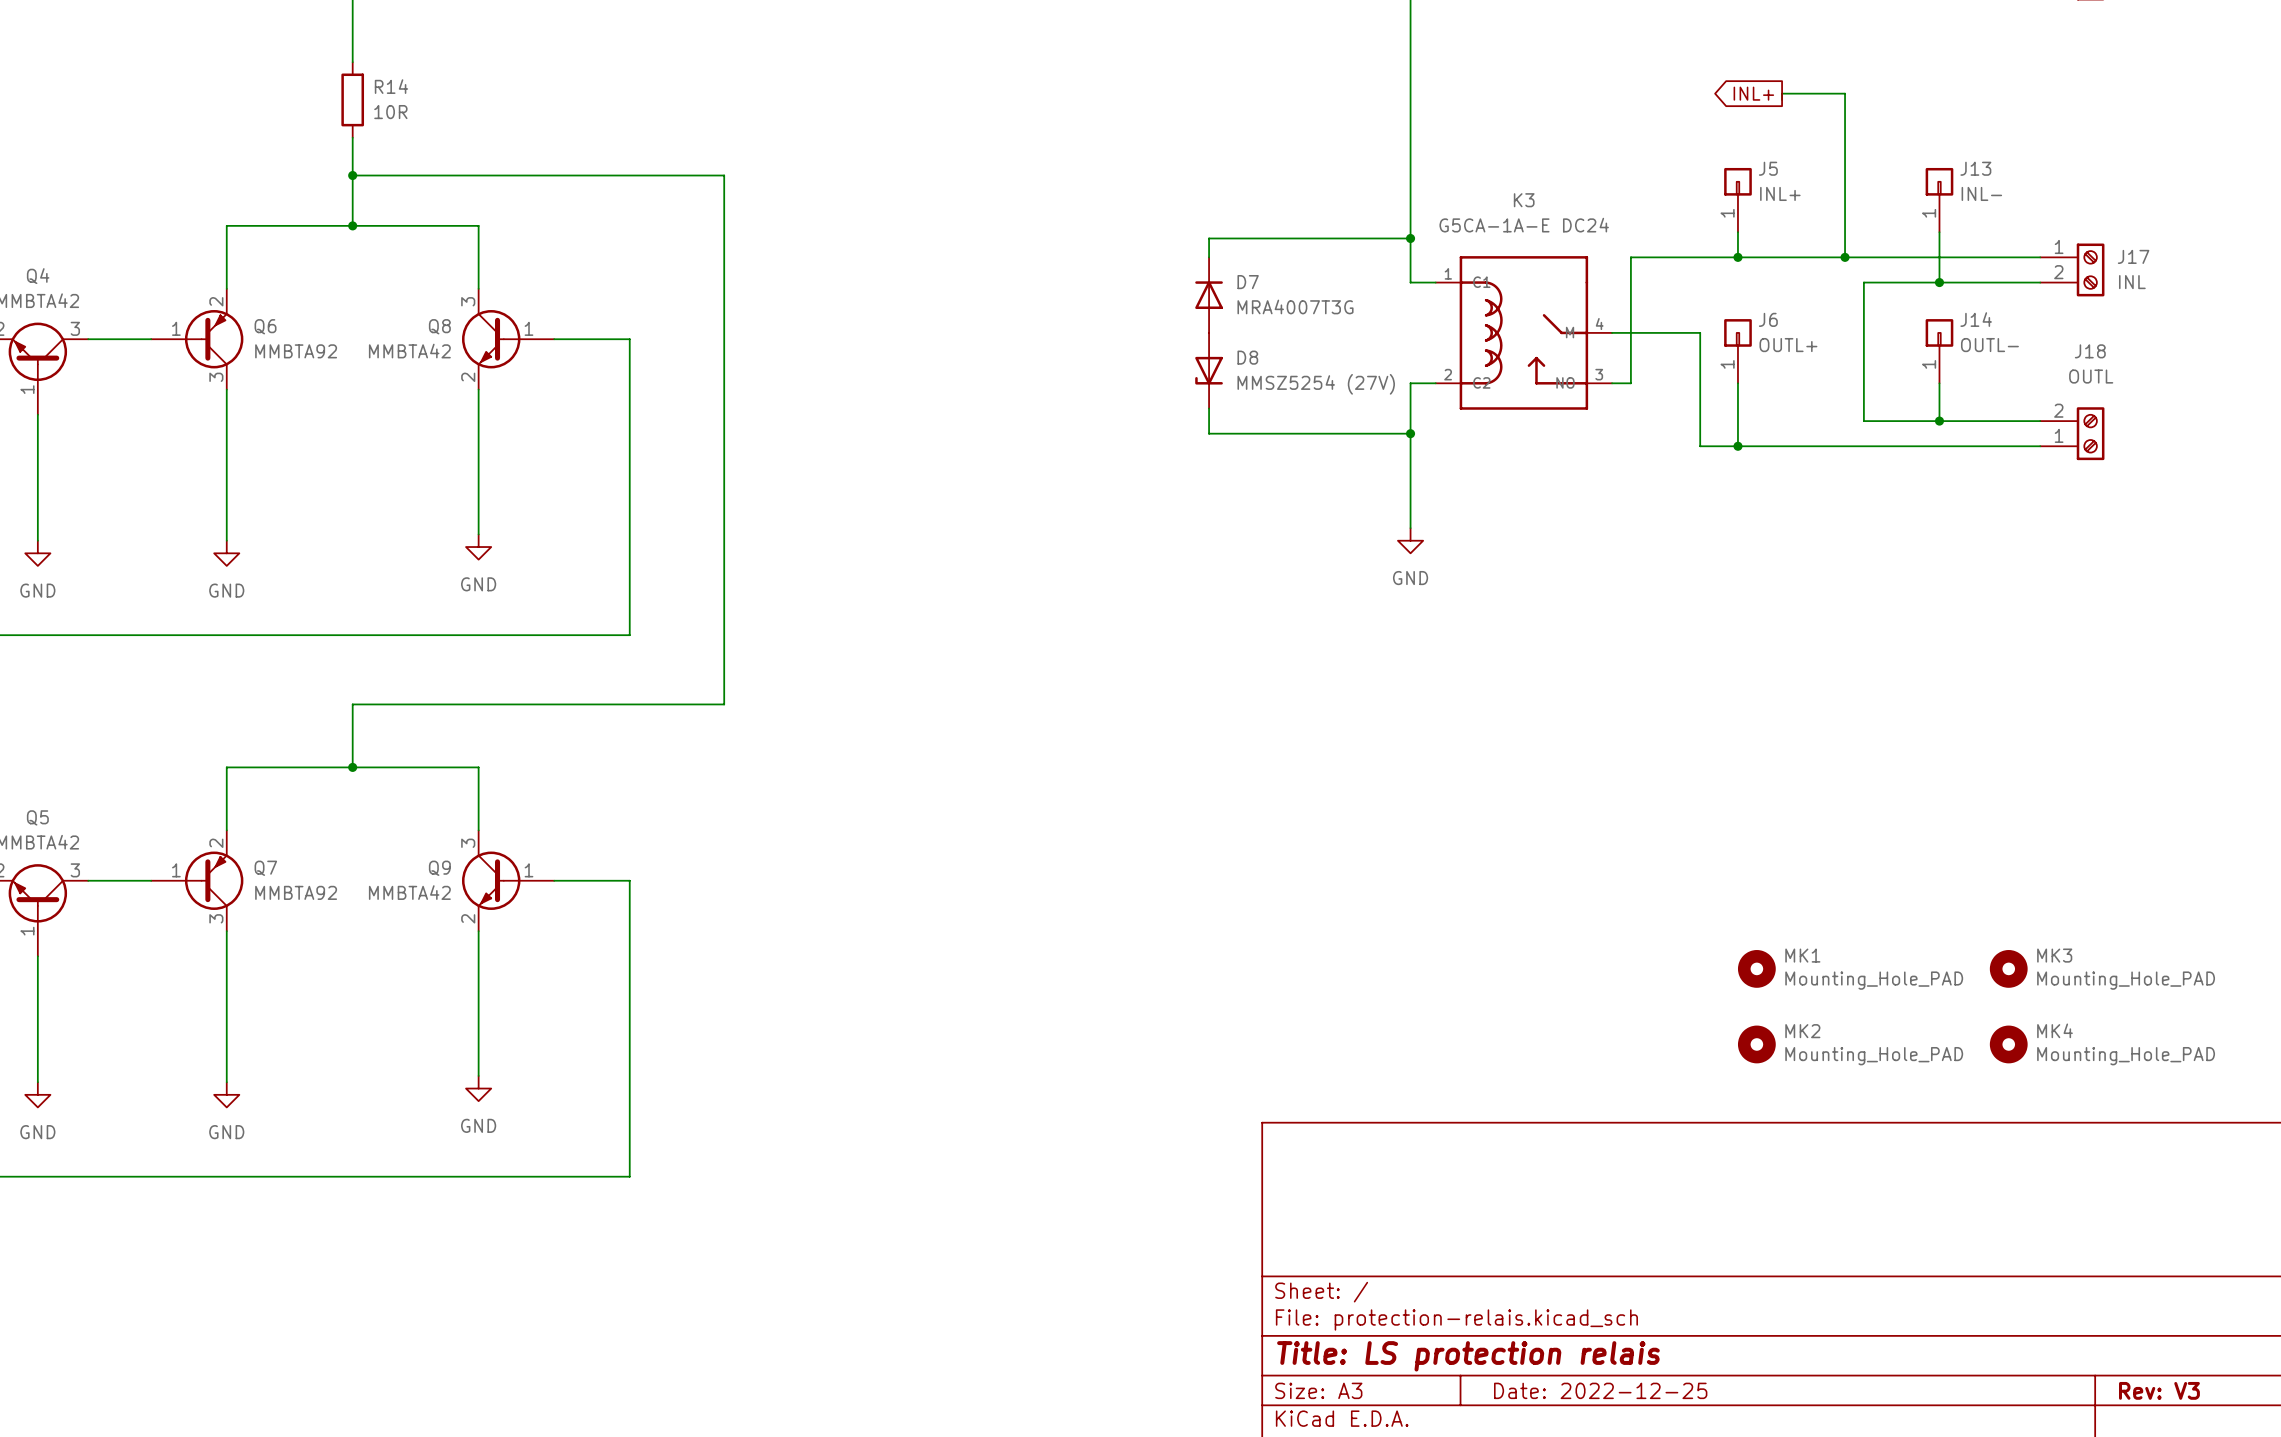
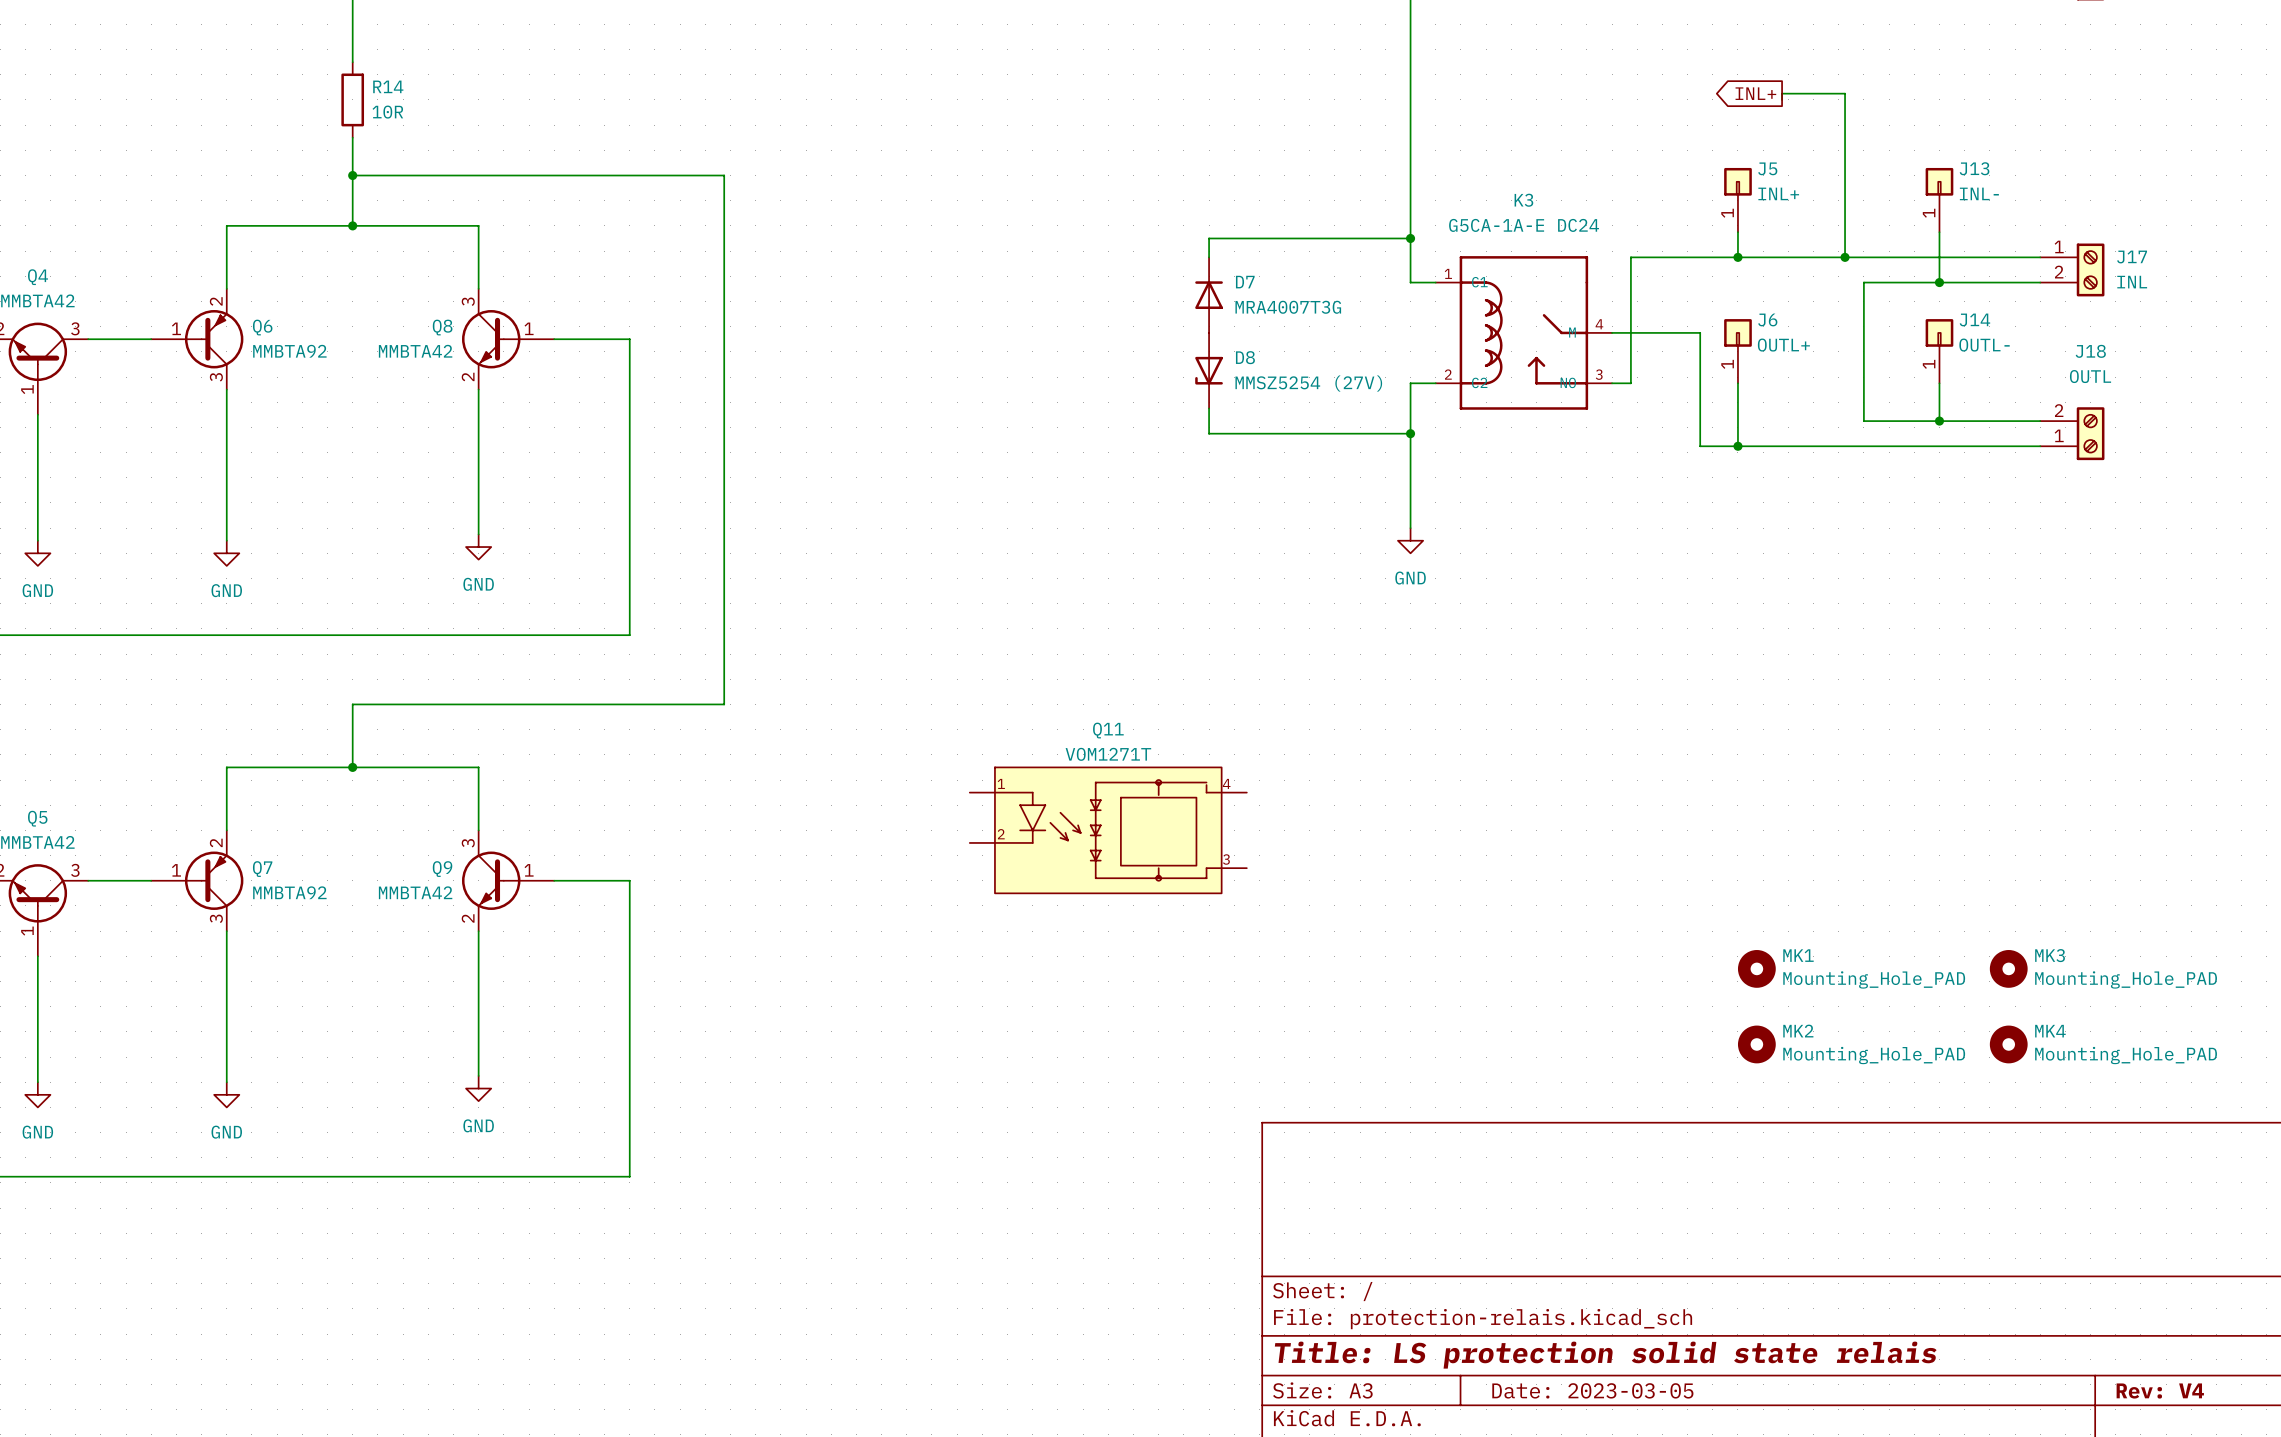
Q11: none -> VOM1271T (1108, 830)
title block: Title: LS protection relais (1468, 1356) -> Title: LS protection solid state relais (1605, 1355)
title block: Date: 2022-12-25 (1600, 1390) -> Date: 2023-03-05 (1592, 1390)
title block: Rev: V3 (2159, 1390) -> Rev: V4 (2160, 1391)

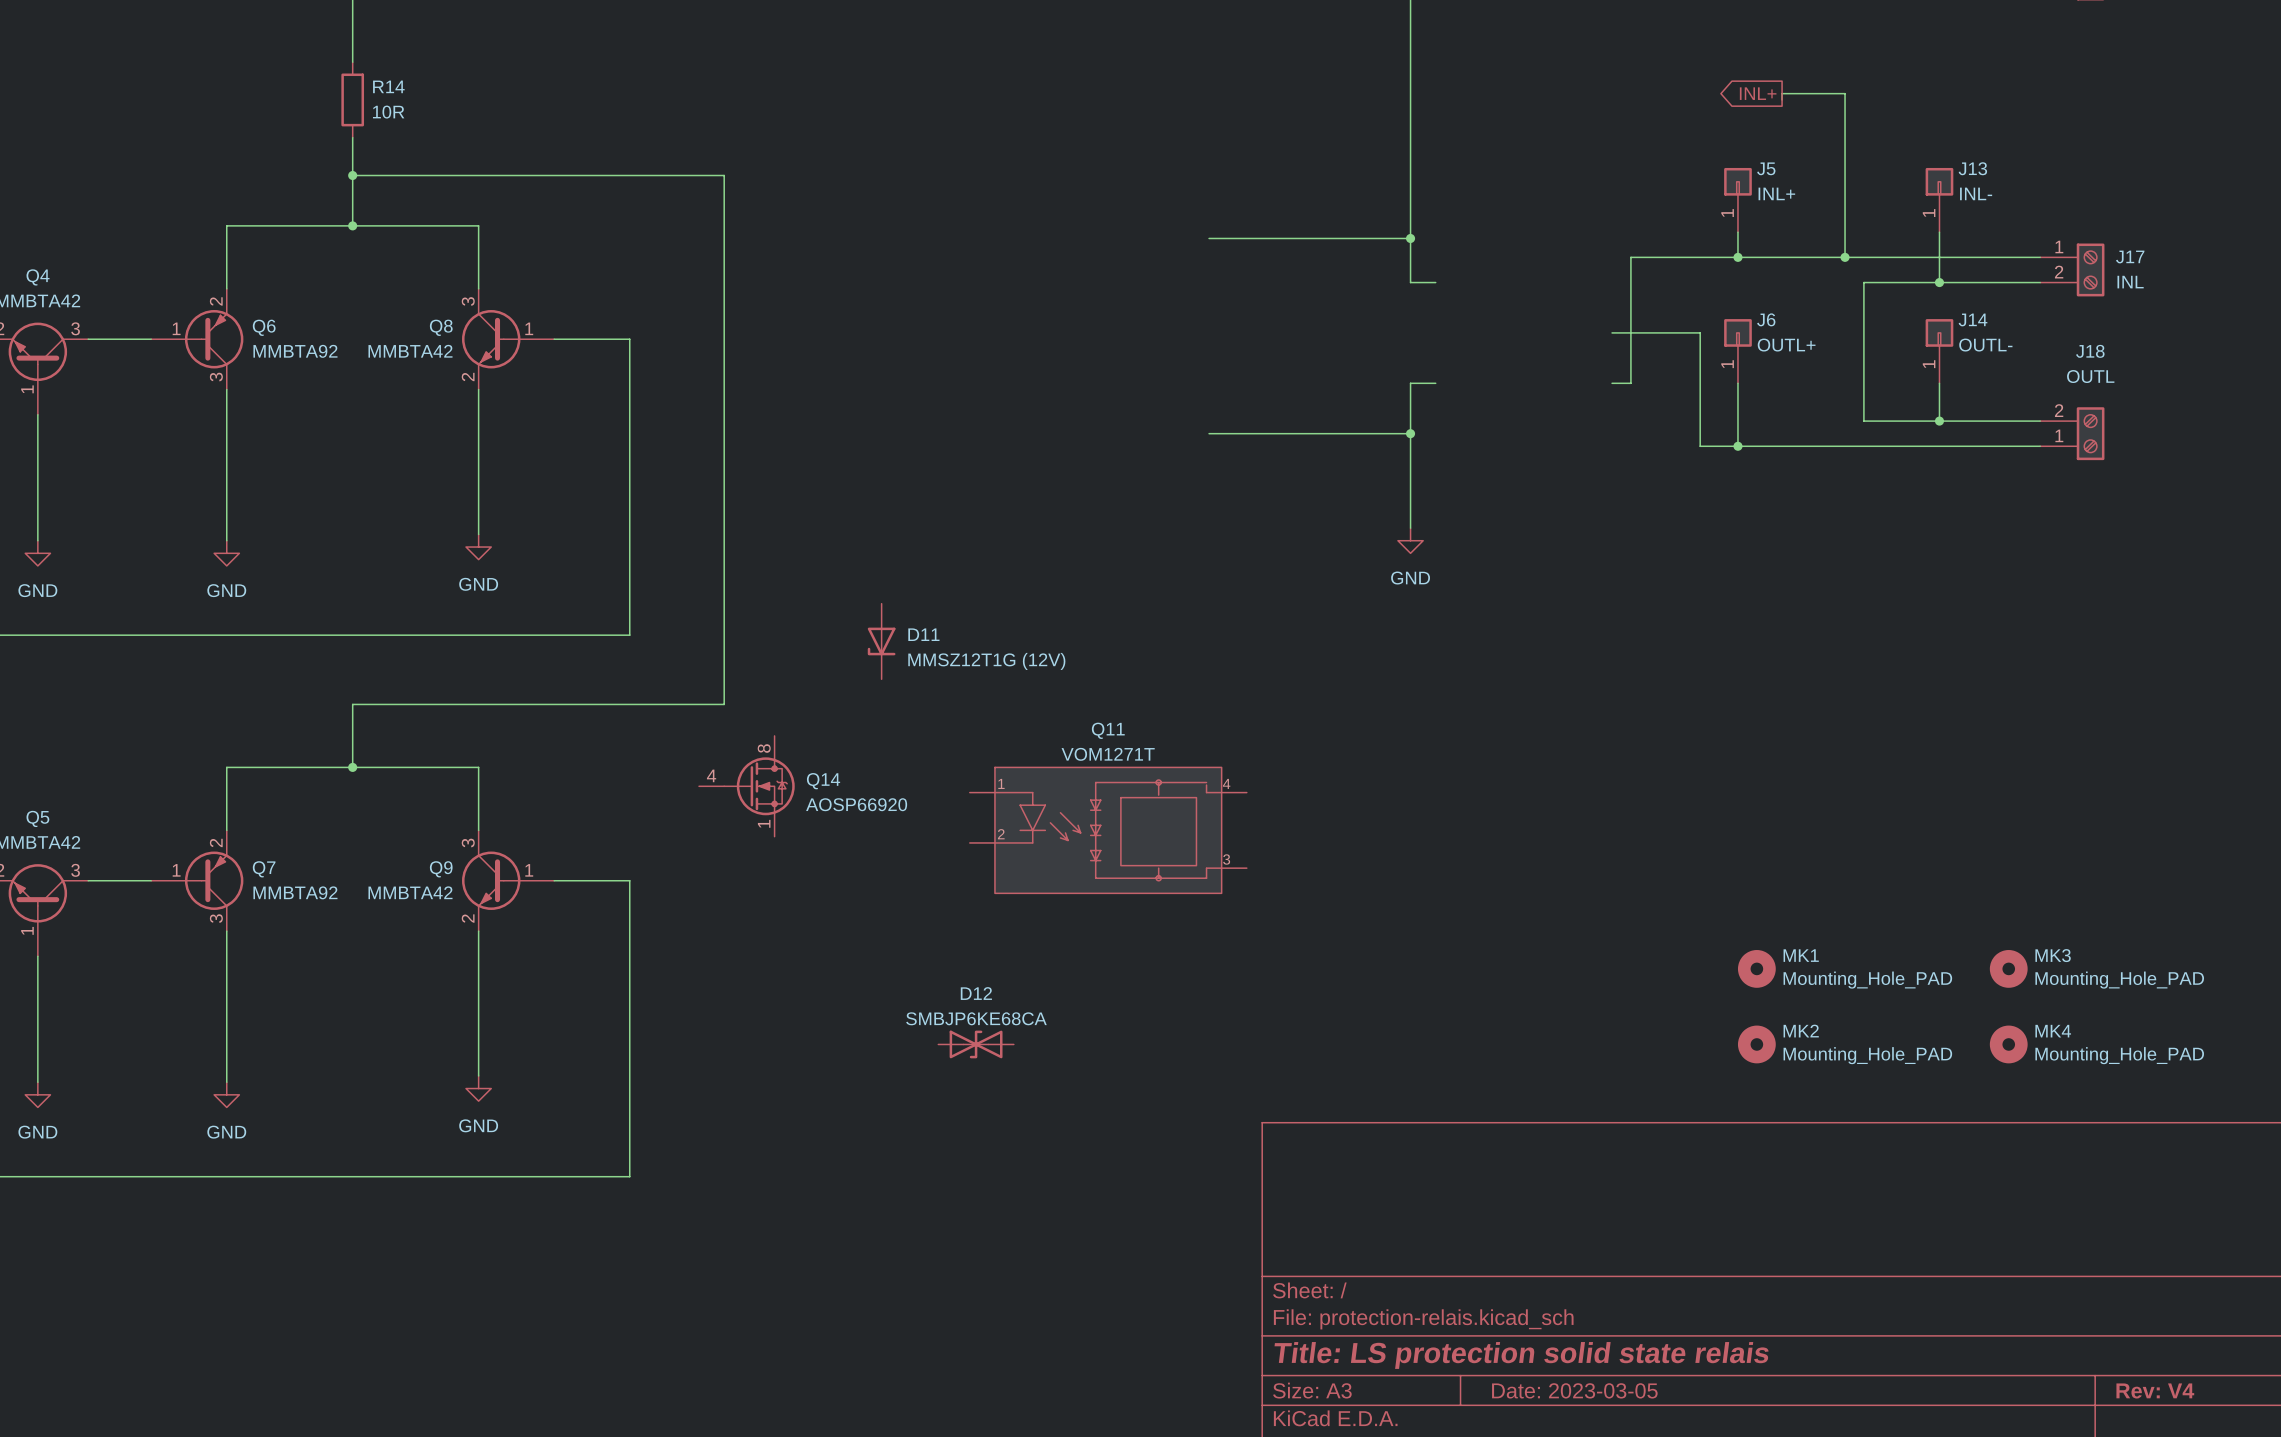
wire: (1209, 238) (1209, 257) -> none
D7: MRA4007T3G (1209, 295) -> none
K3: G5CA-1A-E DC24 (1523, 332) -> none
D8: MMSZ5254 (27V) (1209, 370) -> none
wire: (1209, 408) (1209, 433) -> none
D11: none -> MMSZ12T1G (12V) (881, 641)
Q14: none -> AOSP66920 (746, 786)
D12: none -> SMBJP6KE68CA (976, 1044)

